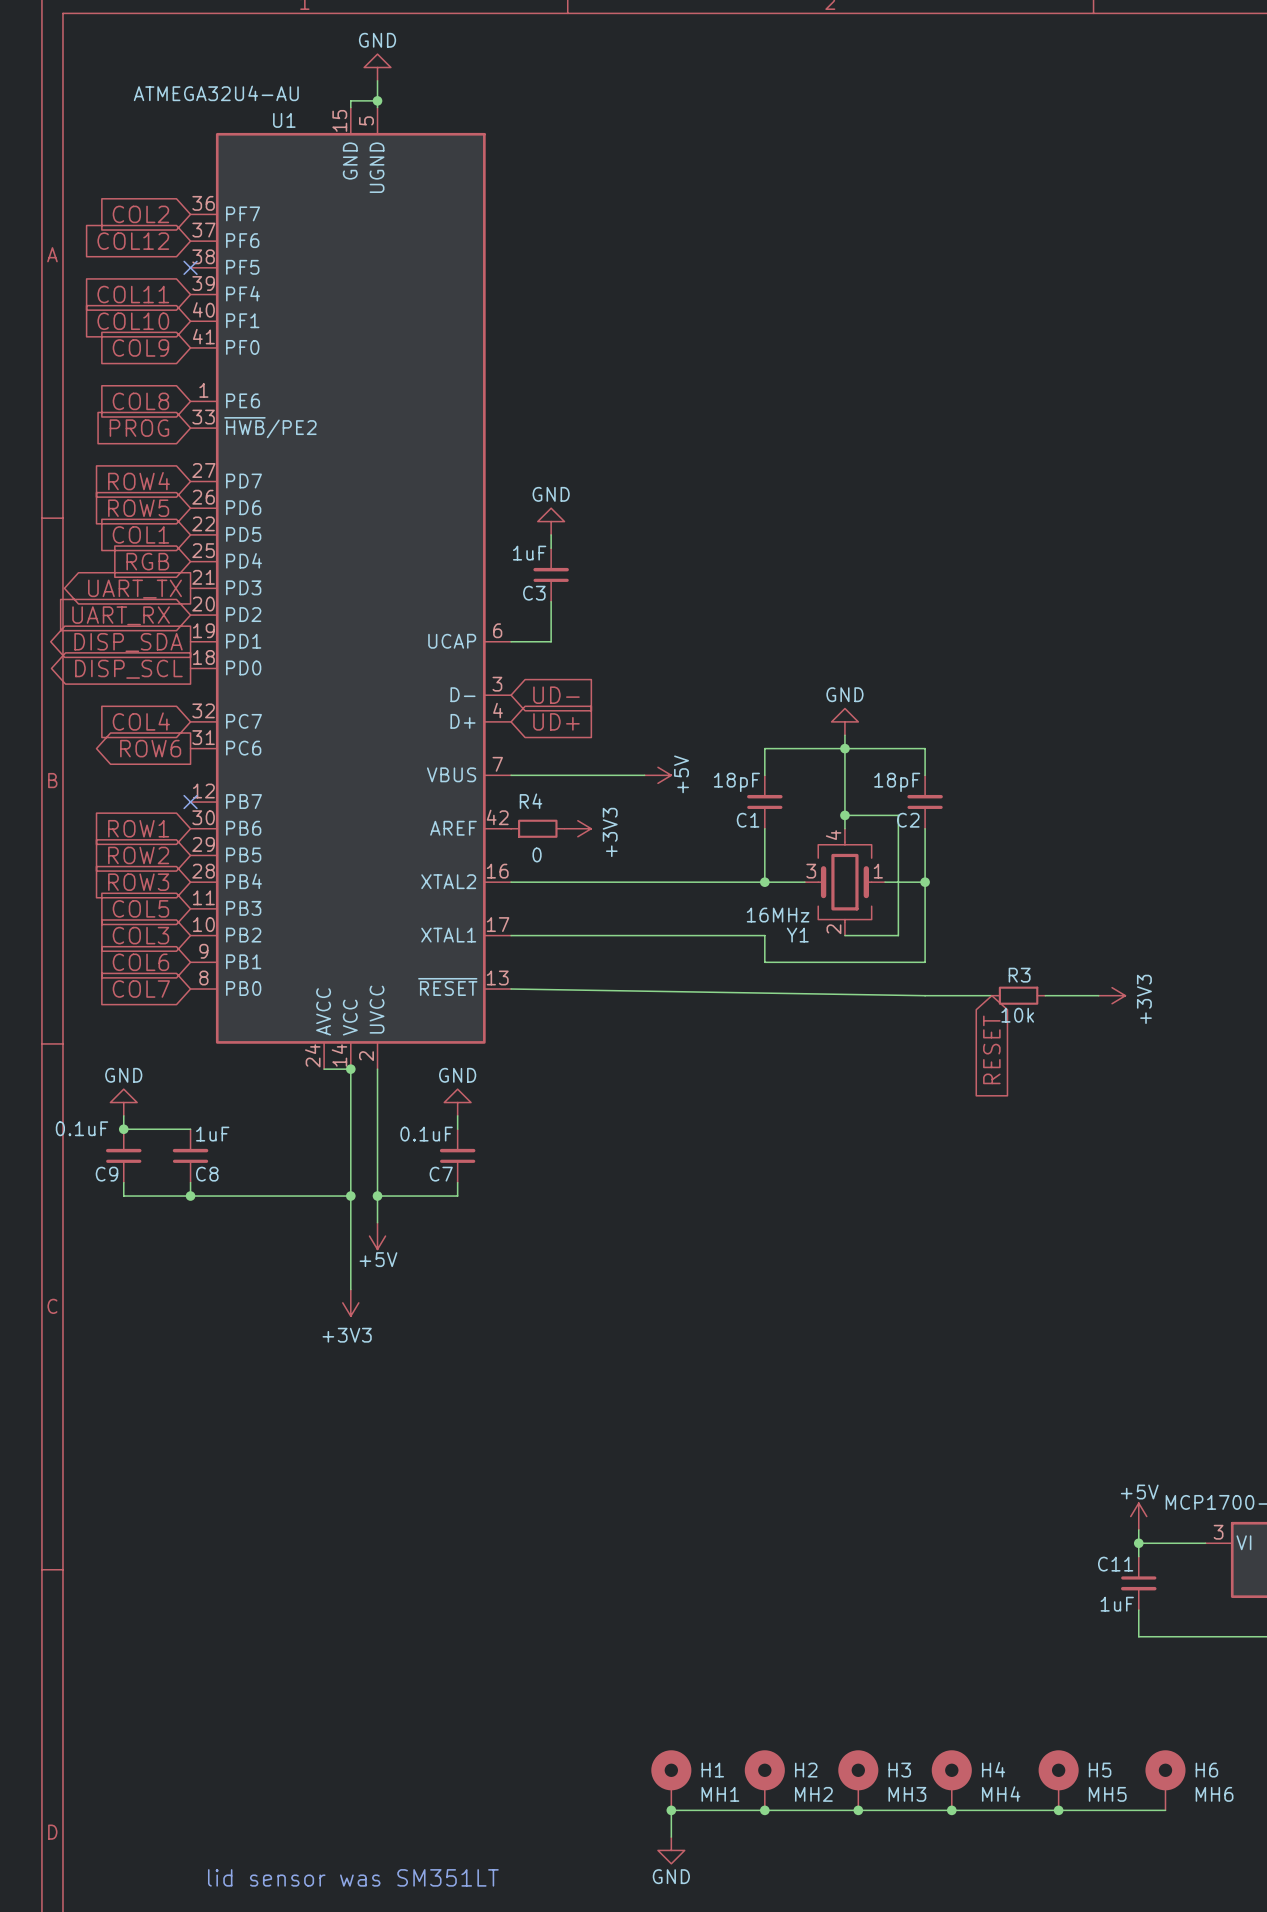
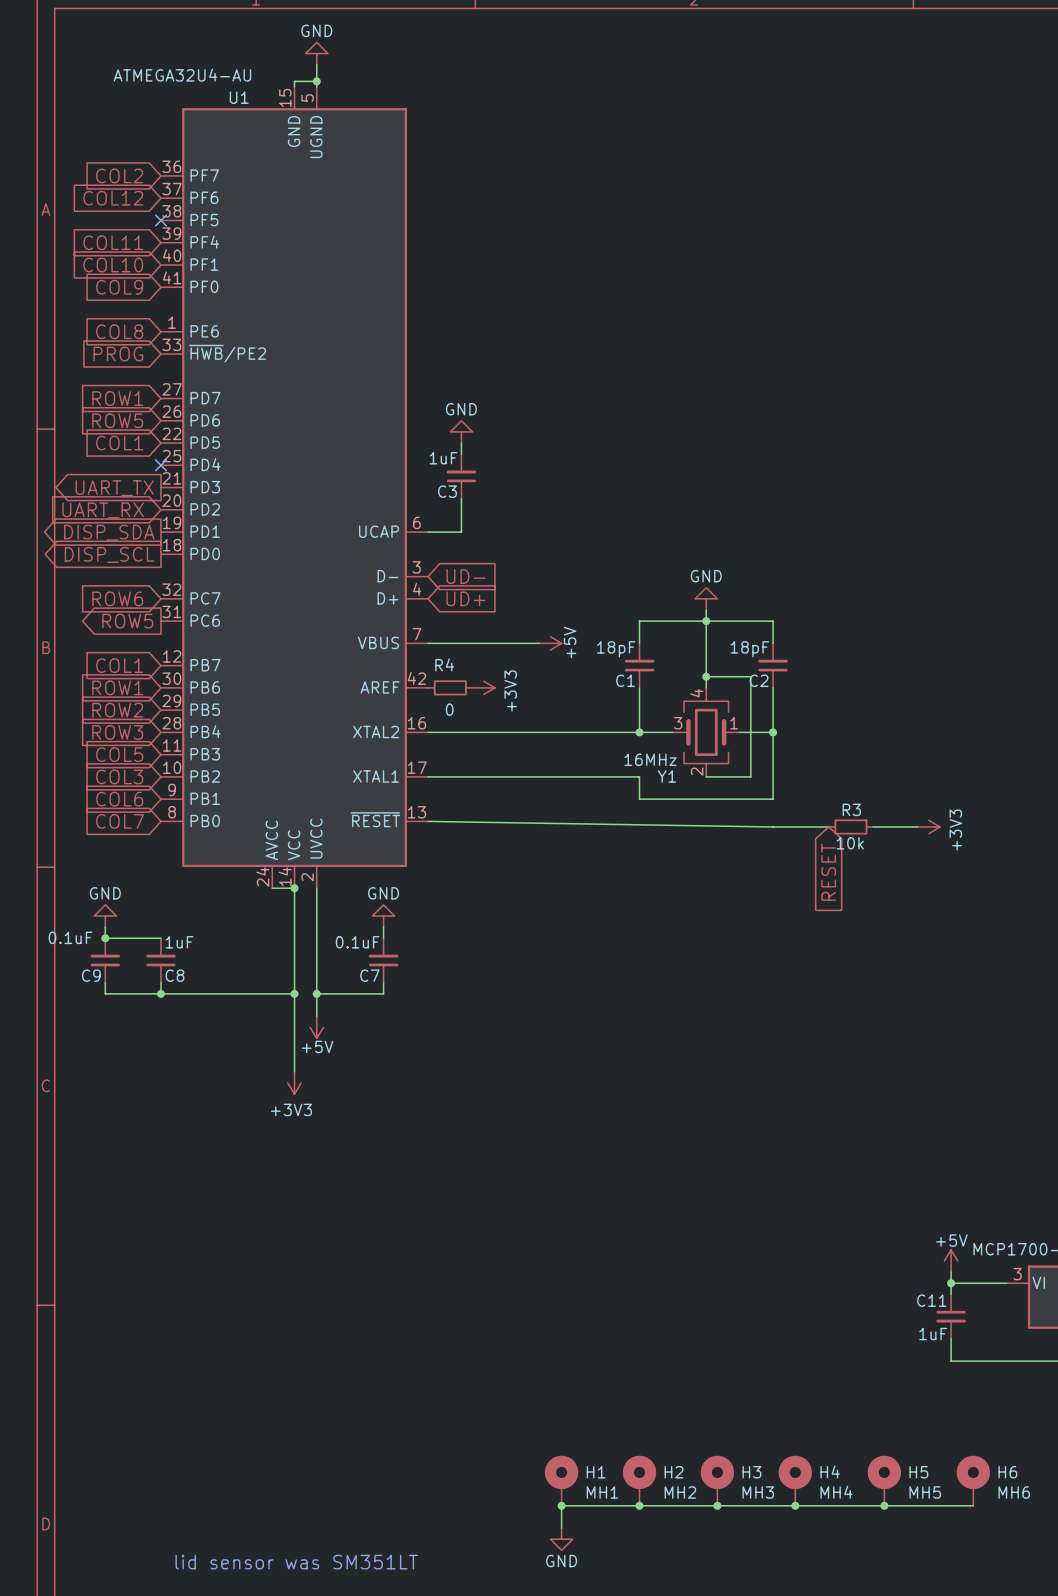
global label: ROW4 (139, 481) -> ROW1 (117, 398)
global label: RGB (147, 561) -> none
no-connect mark: none -> (160, 465)
global label: COL4 (141, 721) -> ROW6 (117, 598)
global label: ROW6 (150, 748) -> ROW5 (127, 621)
global label: none -> COL1 (119, 665)
no-connect mark: (190, 802) -> none

